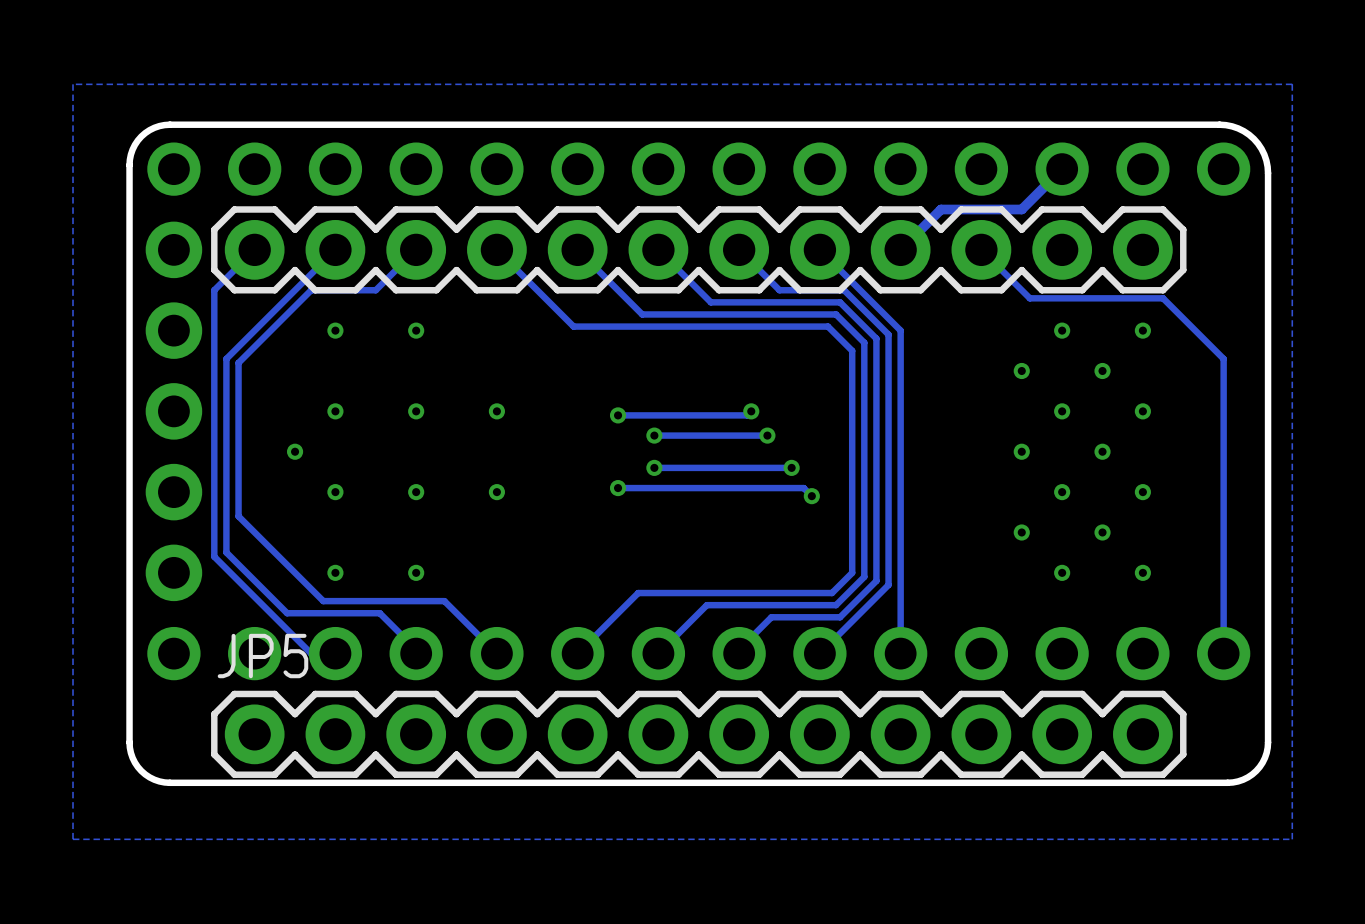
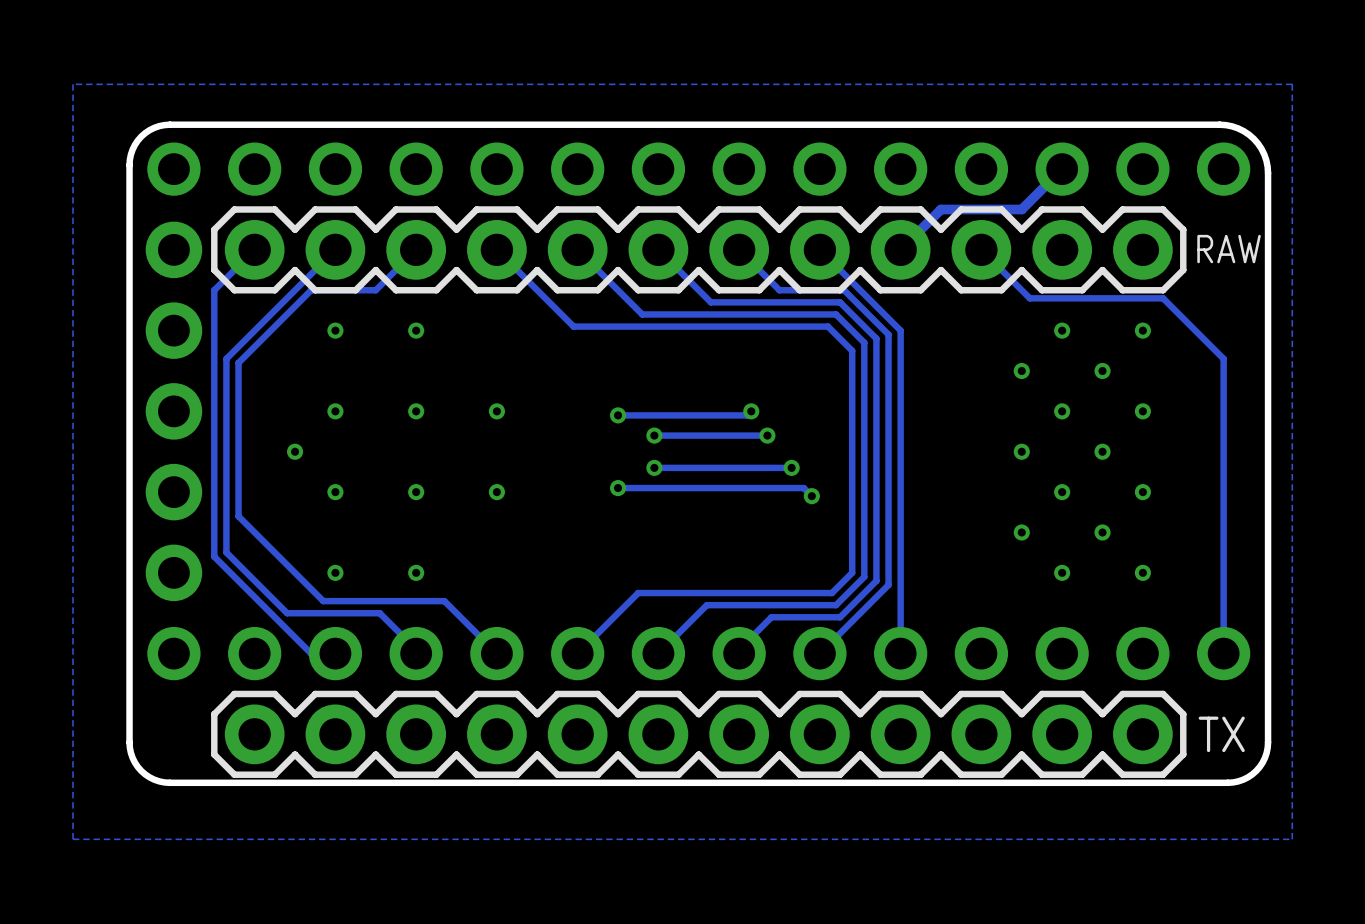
text: none -> RAW (1229, 249)
JP5 name: JP5 (262, 656) -> none
text: none -> TX (1221, 734)

